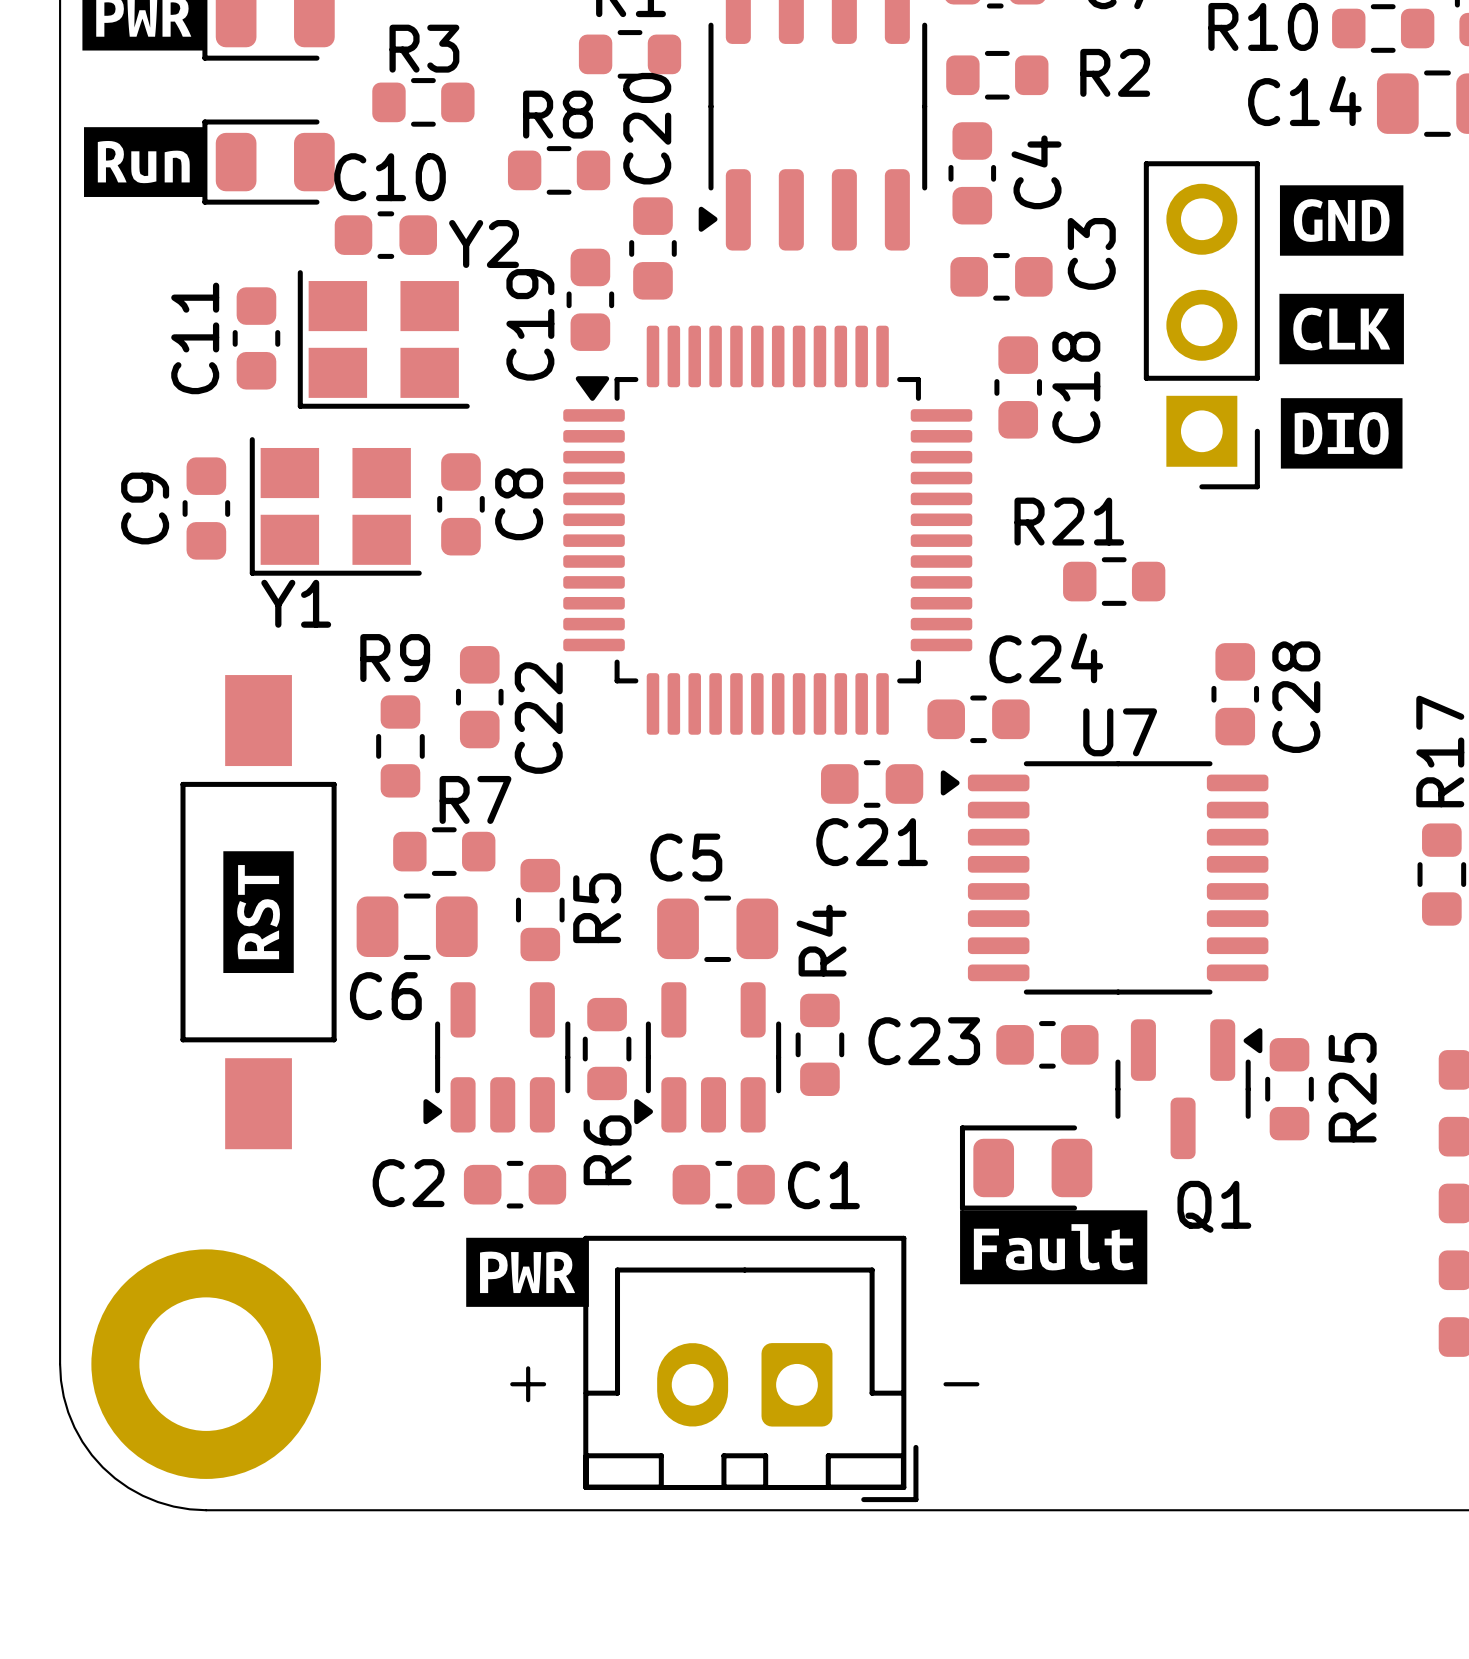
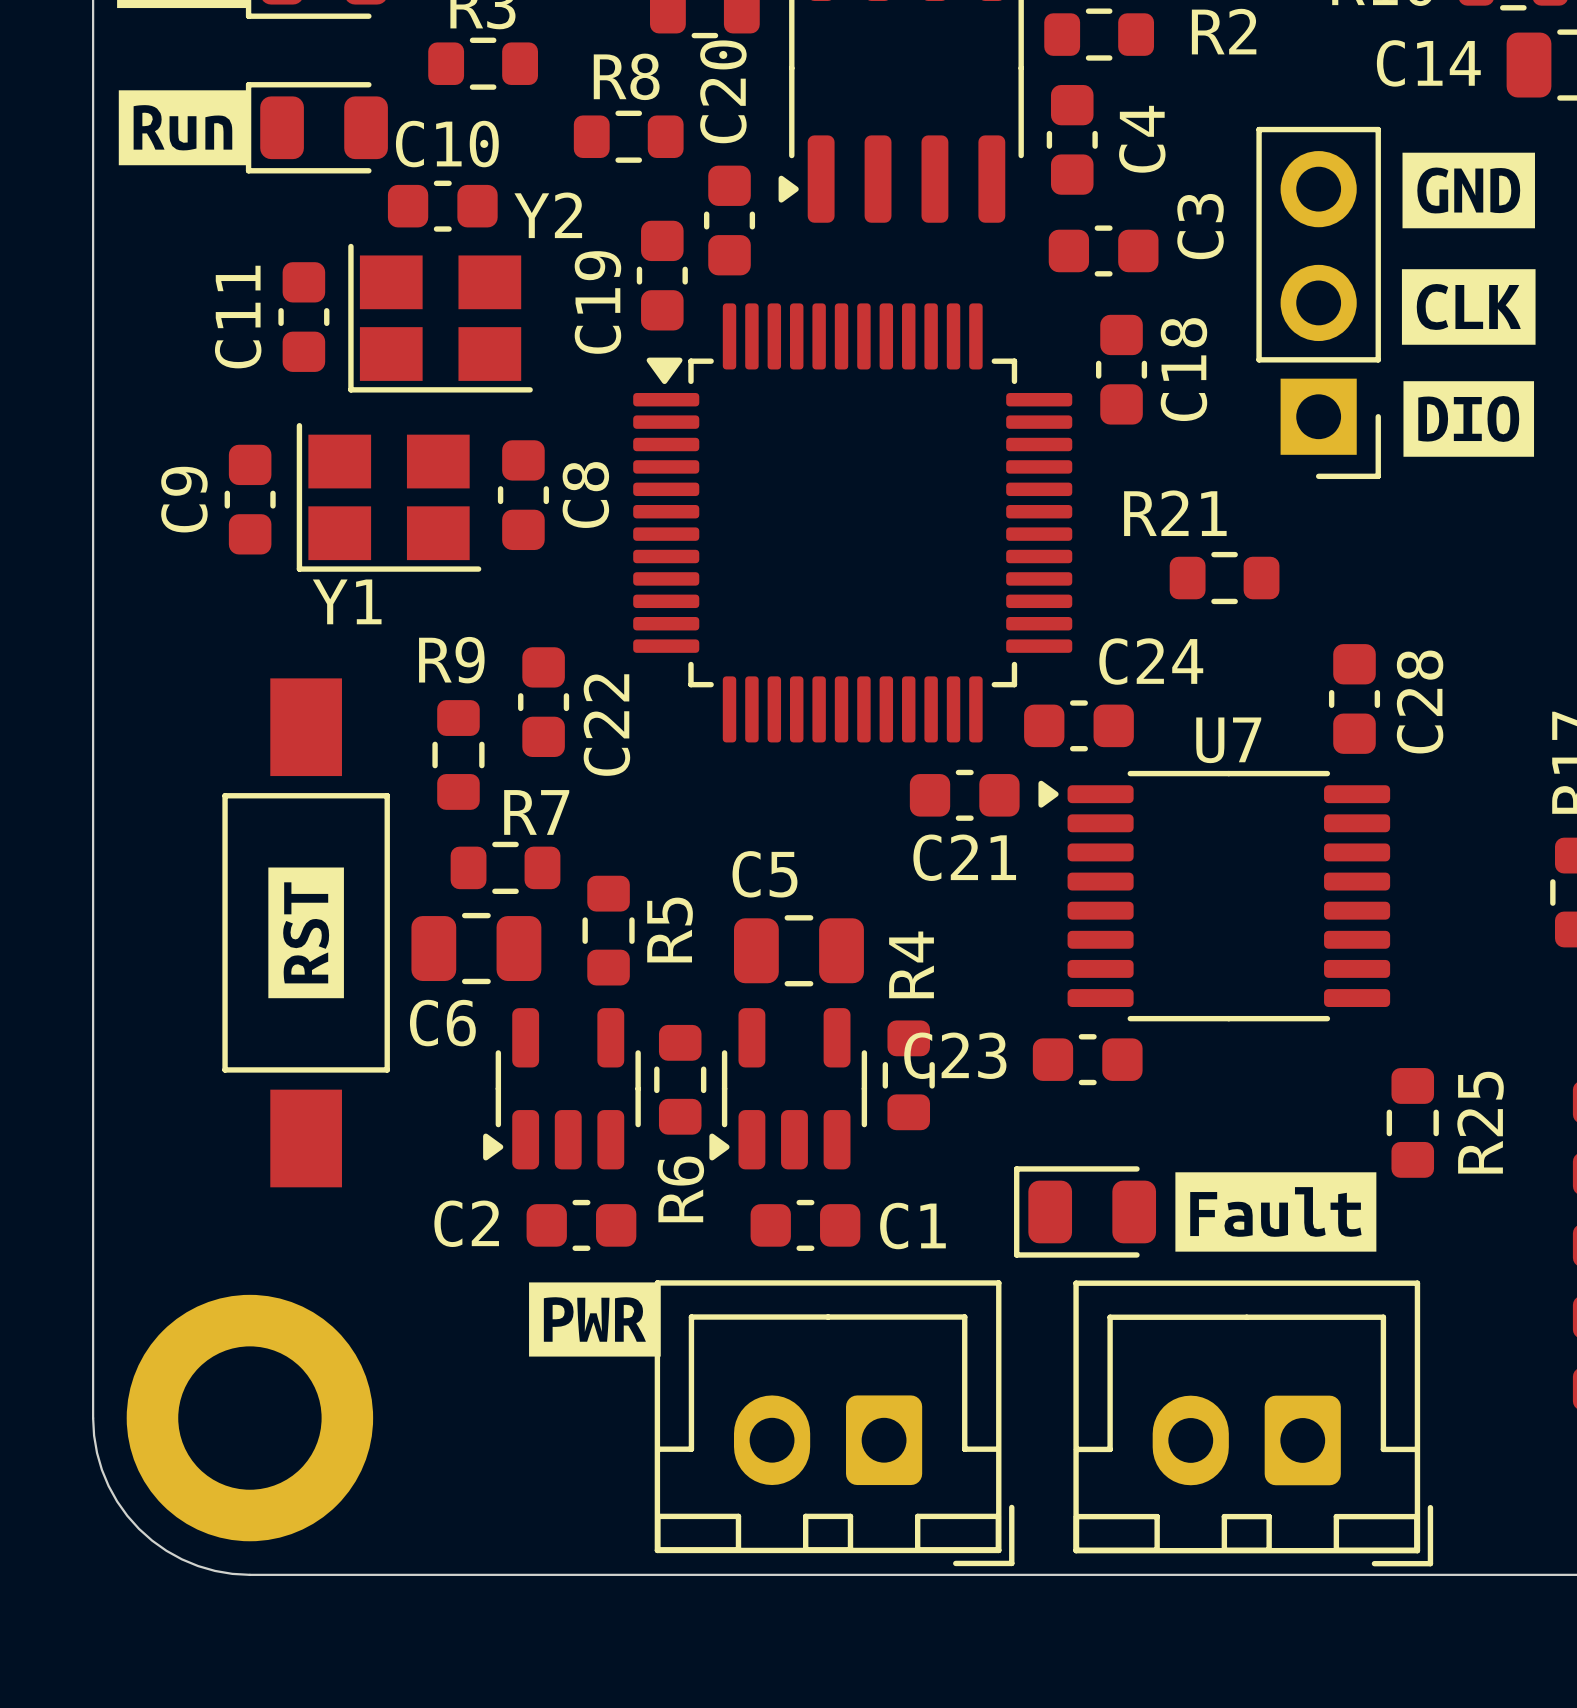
C23 position: (1047, 1044) -> (1087, 1059)
Q1: (1188, 1089) -> none
part position: (1026, 1167) -> (1085, 1211)
drawing position: (1053, 1247) -> (1275, 1211)
part: none -> (1253, 1423)
text: + - (744, 1384) -> none

